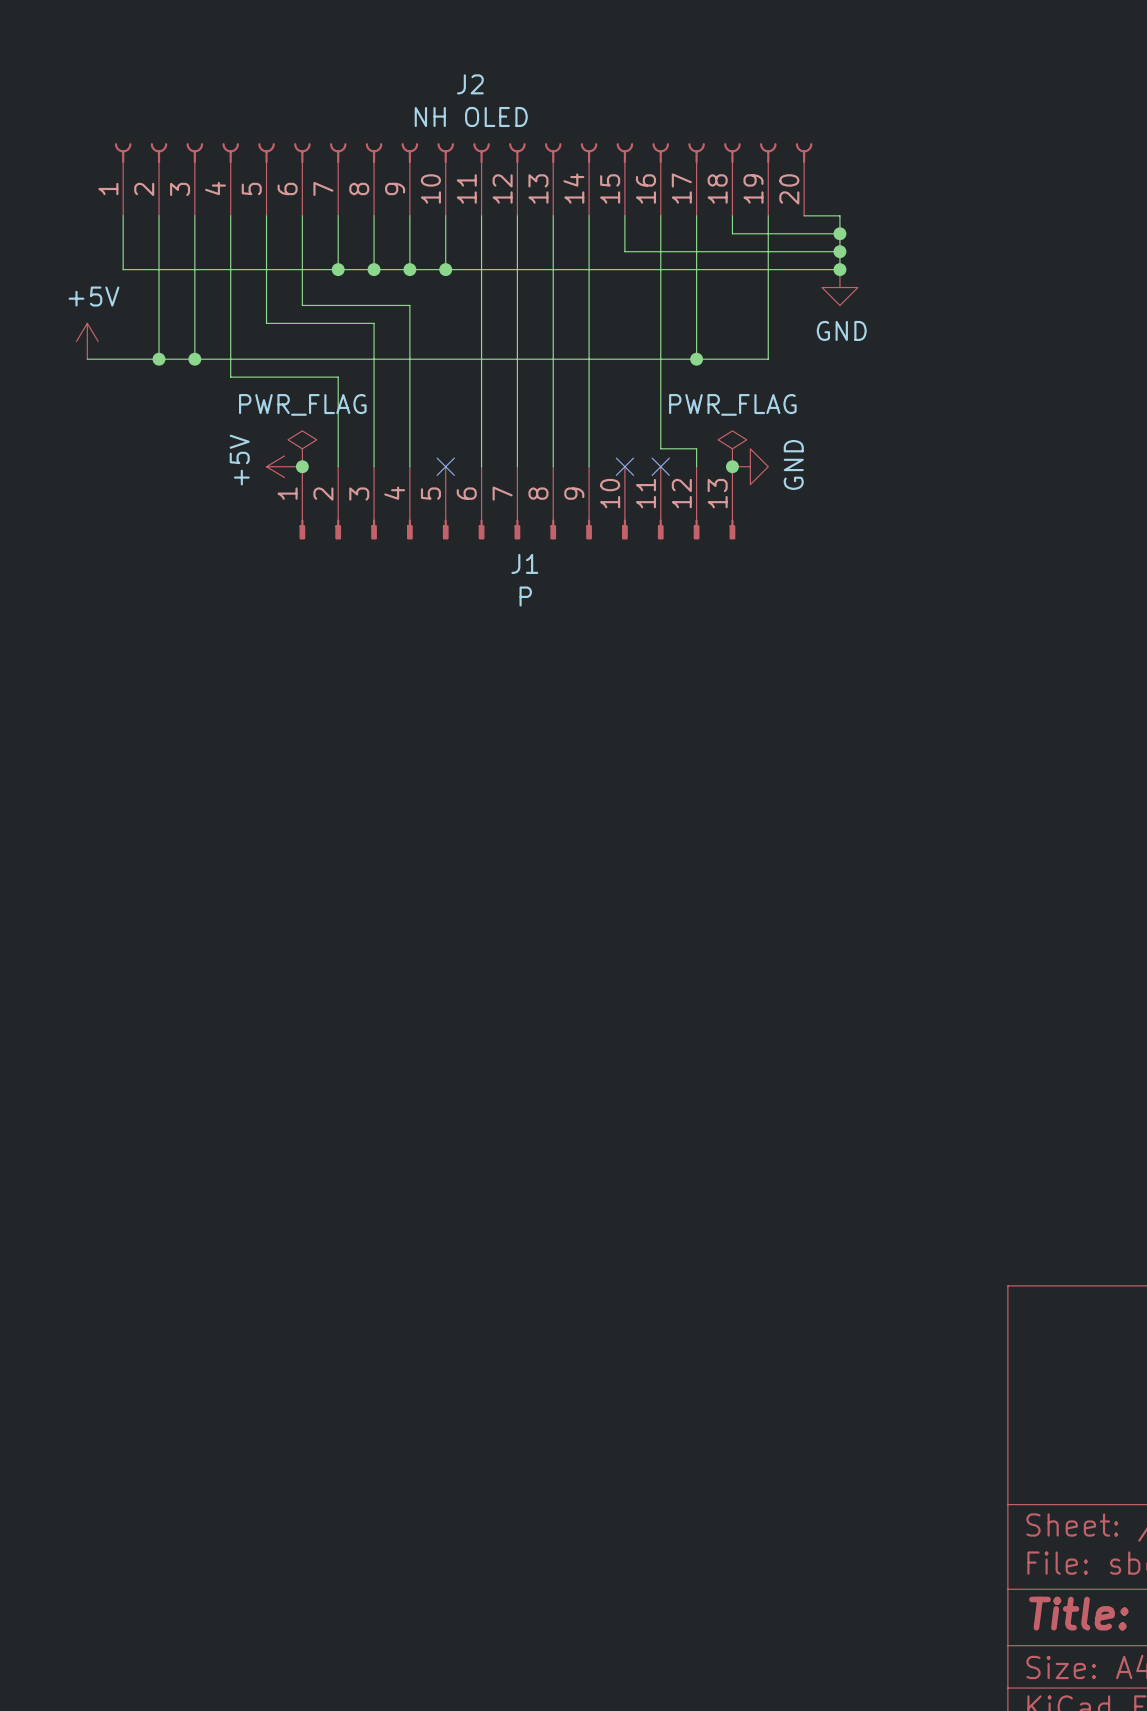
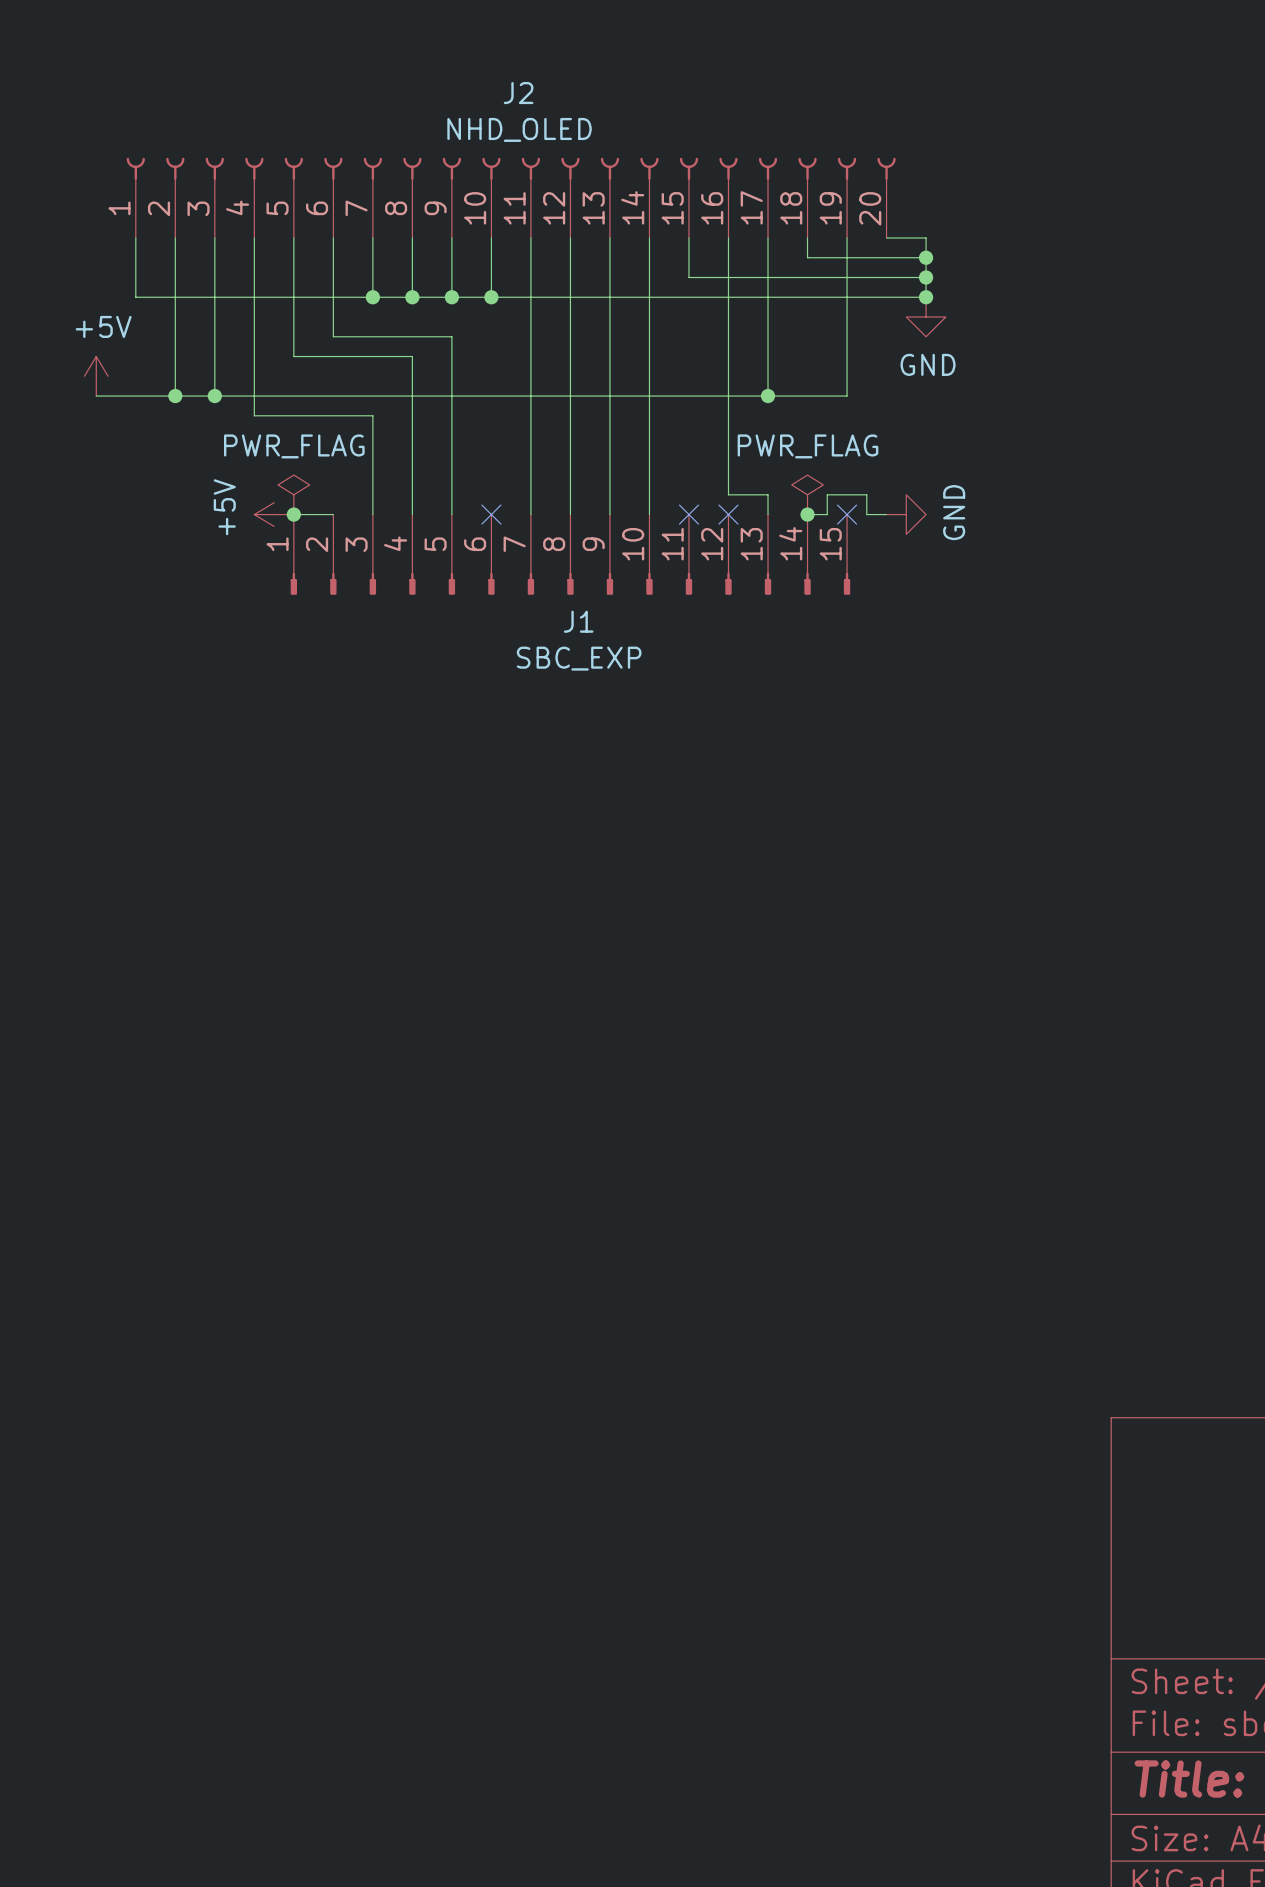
J2 value: NH OLED (471, 116) -> NHD_OLED (519, 129)
power symbol position: PWR_FLAG (302, 448) -> PWR_FLAG (293, 494)
power symbol position: +5V (284, 466) -> +5V (274, 514)
J1 symbol: [299, 466, 736, 540] -> [290, 514, 851, 595]
junction position: (302, 466) -> (293, 514)
wire: none -> (807, 514) (827, 514) (827, 494) (866, 494) (866, 514) (886, 514)
power symbol position: GND (750, 466) -> GND (906, 514)
no-connect mark: none -> (847, 514)
J1 value: P (525, 596) -> SBC_EXP (579, 658)

